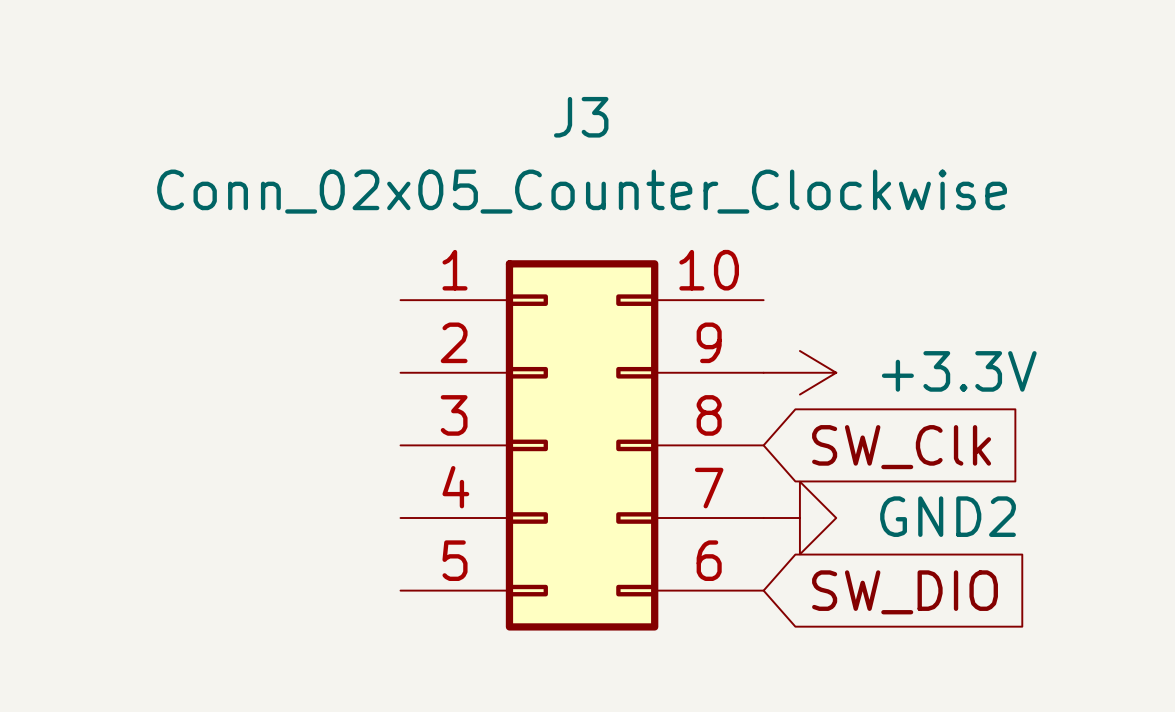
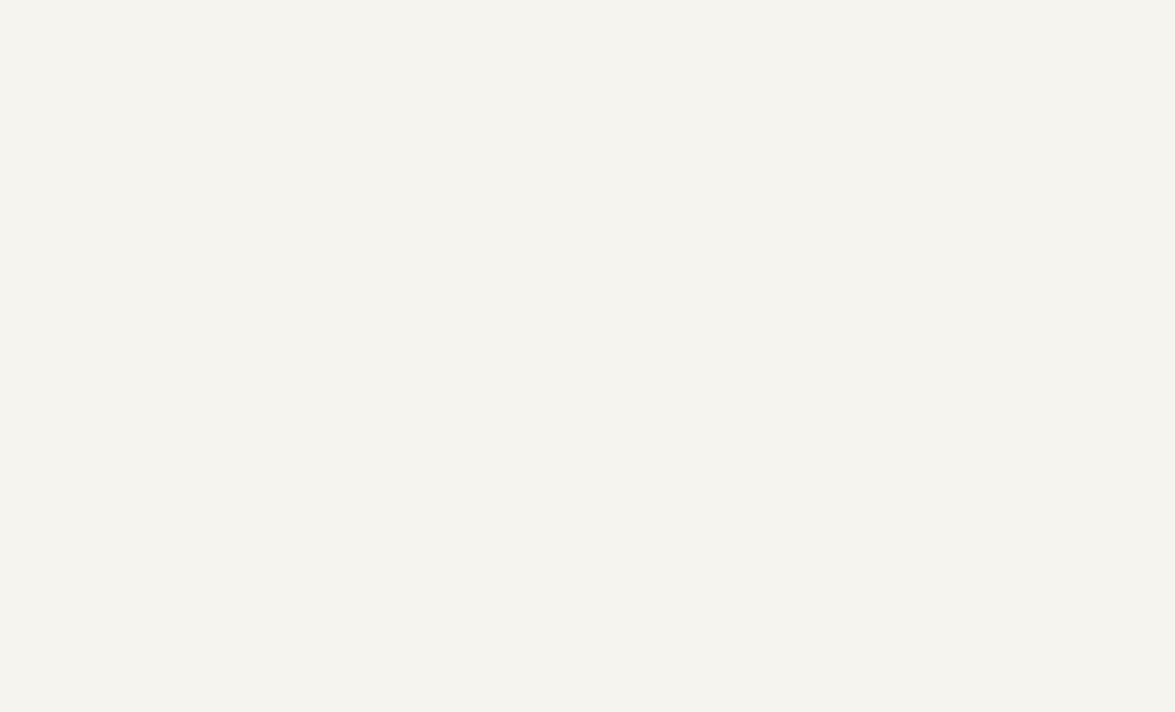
power symbol: +3.3V (799, 372) -> none
J3: Conn_02x05_Counter_Clockwise (582, 445) -> none
global label: SW_Clk (901, 447) -> none
power symbol: GND2 (799, 518) -> none
global label: SW_DIO (905, 592) -> none

